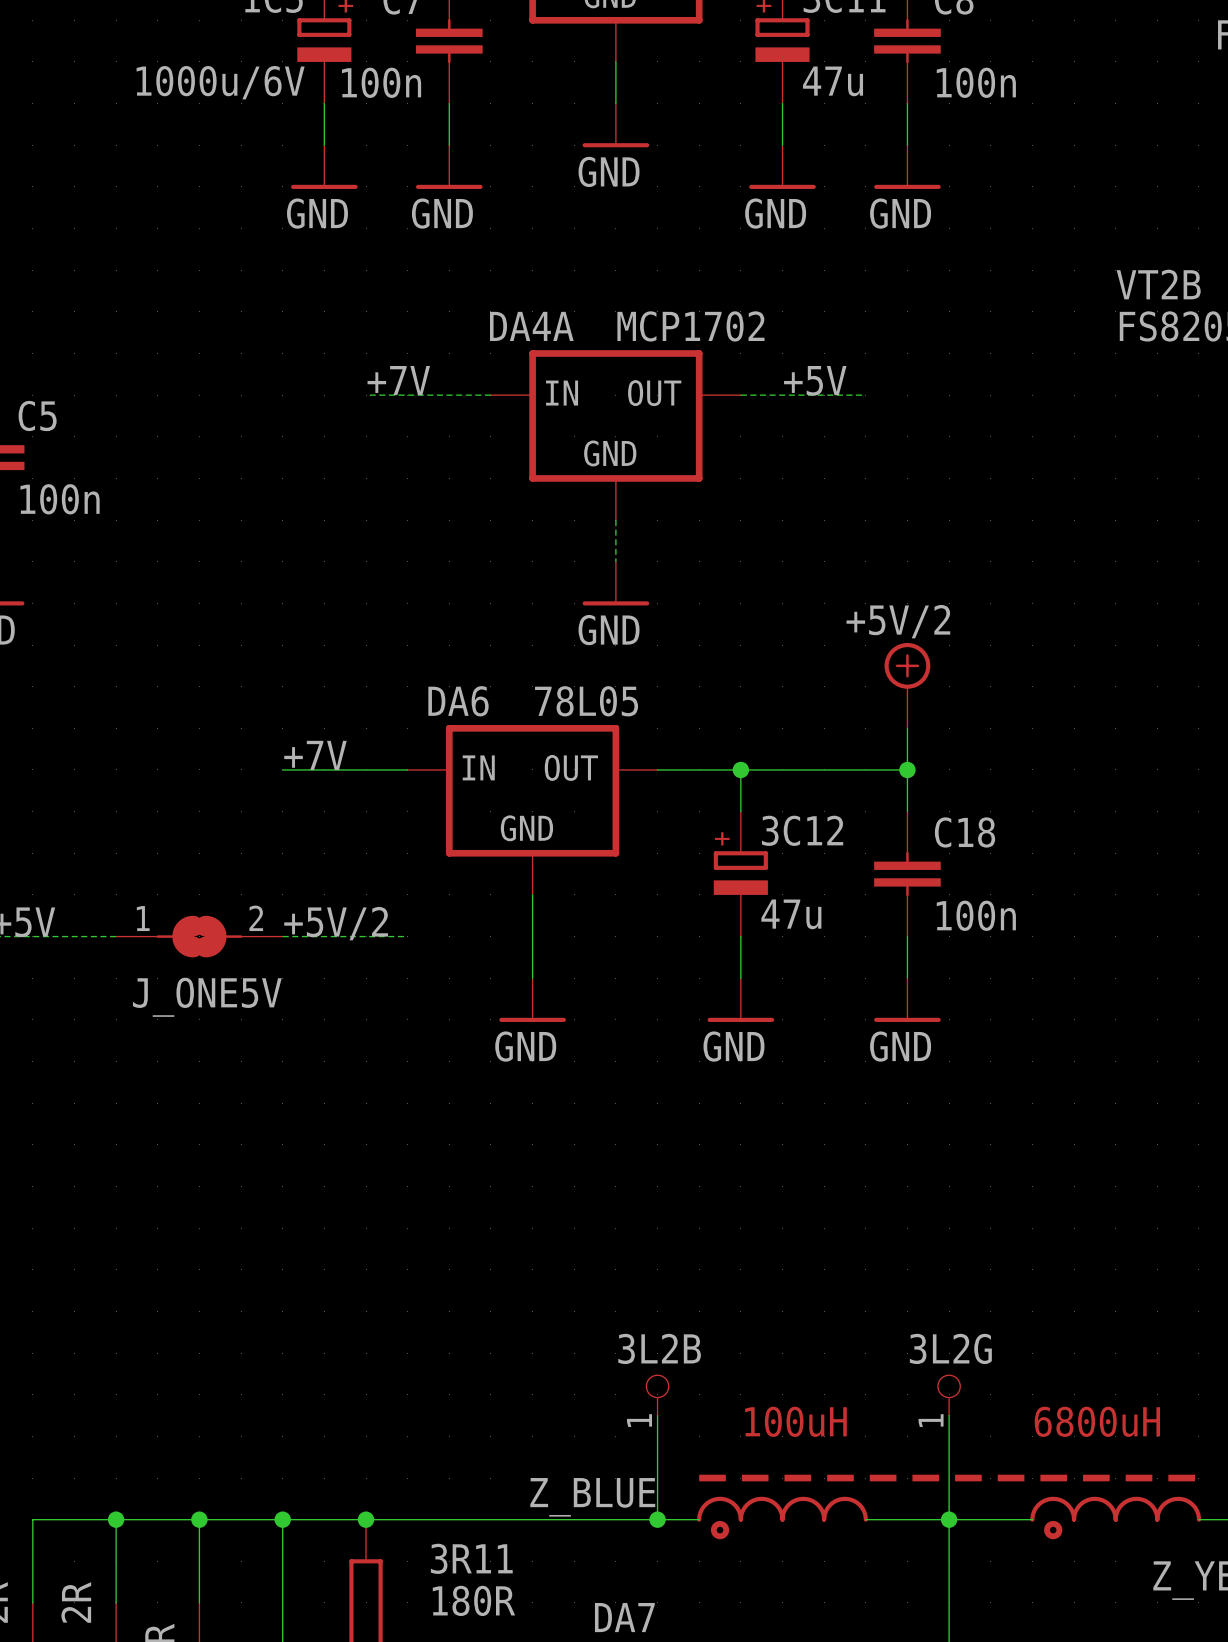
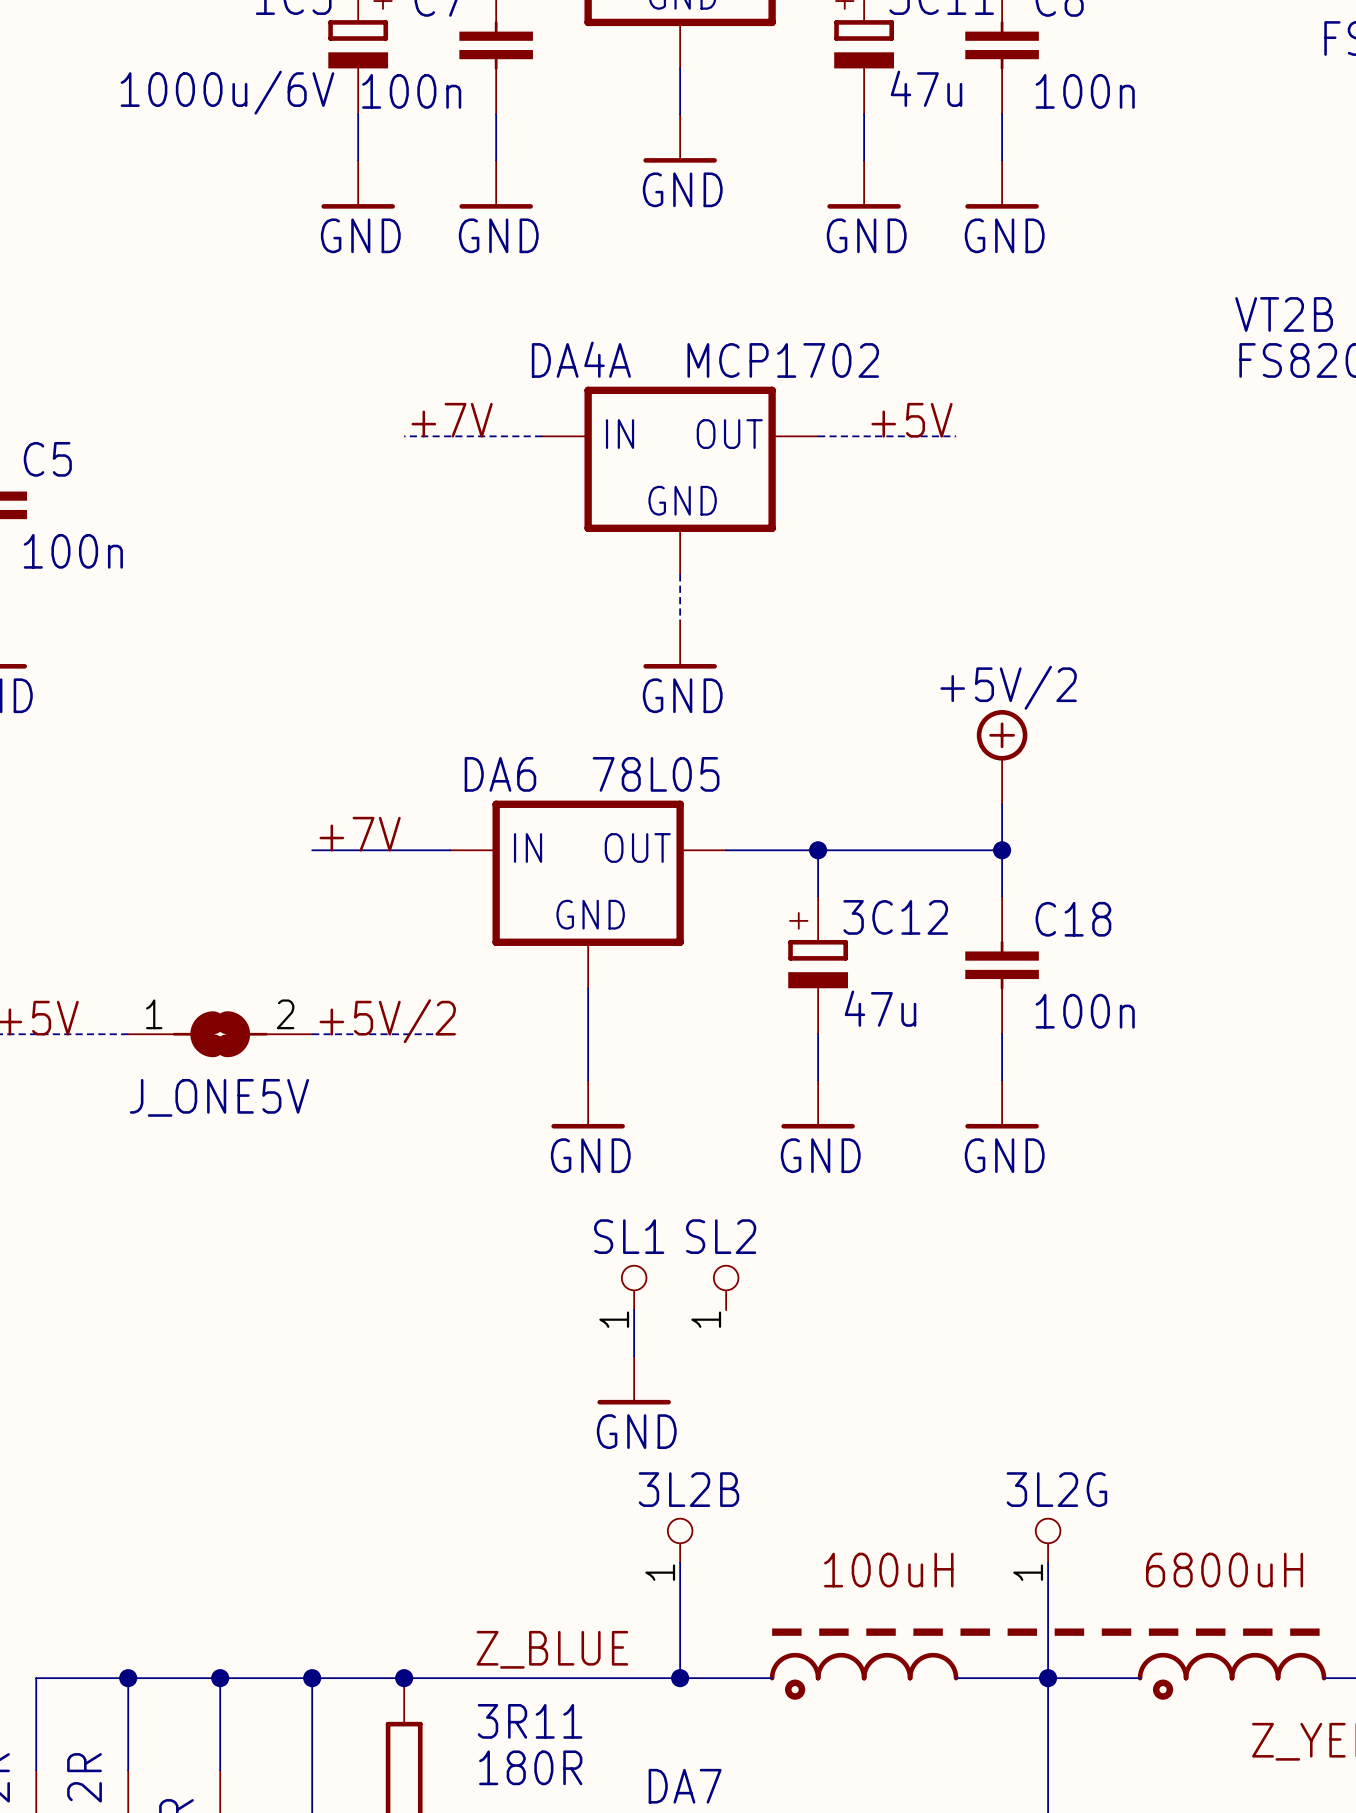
SL1: none -> (634, 1287)
SL2: none -> (726, 1287)
wire: none -> (634, 1310) (634, 1356)
power symbol: none -> GND (634, 1380)
3L2B position: (657, 1395) -> (680, 1540)
wire: (657, 1415) (657, 1519) -> (680, 1563) (680, 1678)
label position: Z_BLUE (592, 1497) -> Z_BLUE (552, 1649)
junction position: (657, 1519) -> (680, 1678)

